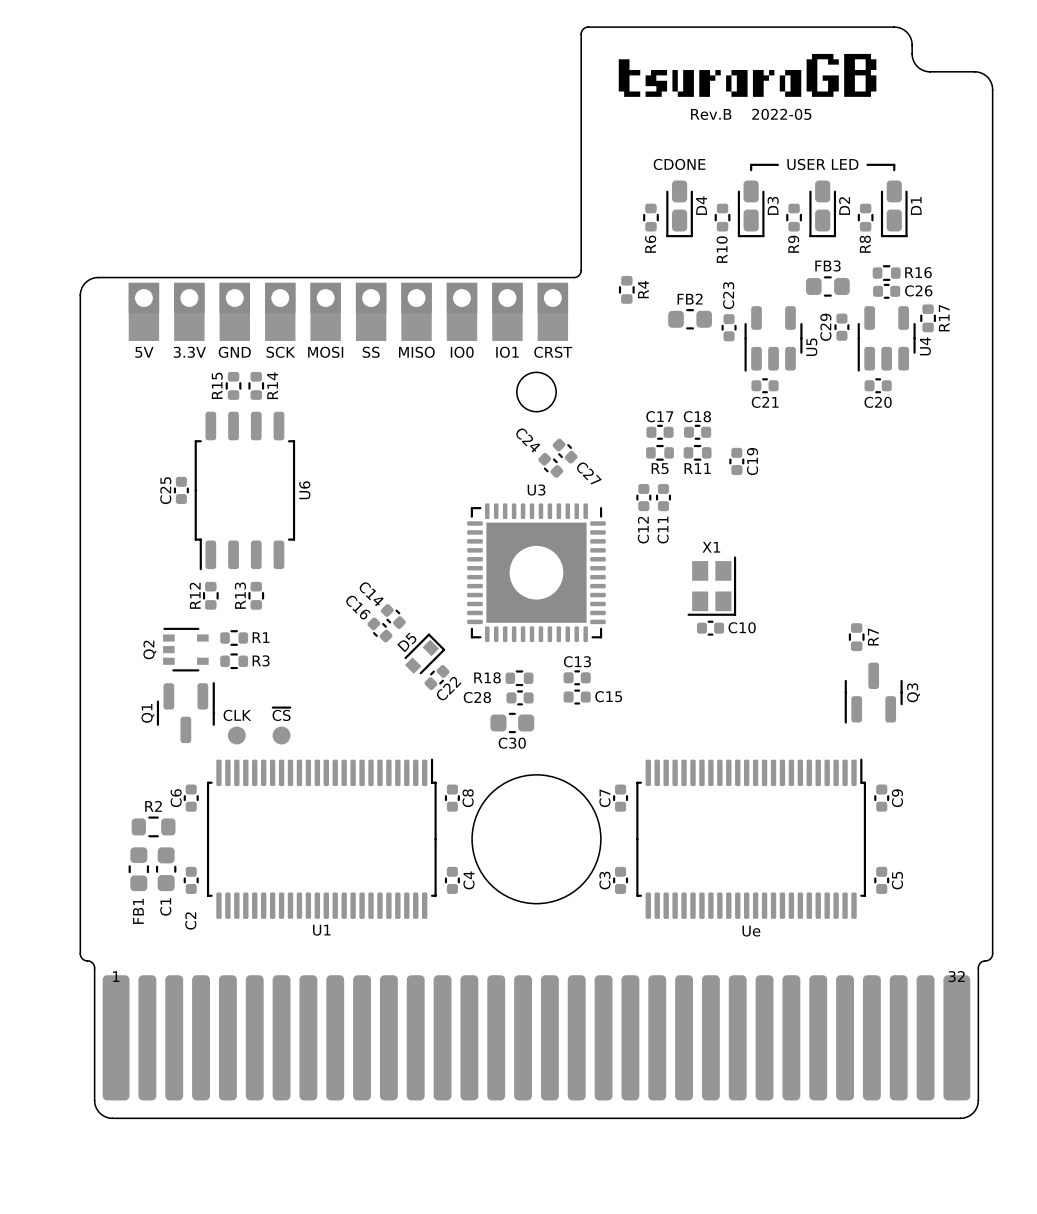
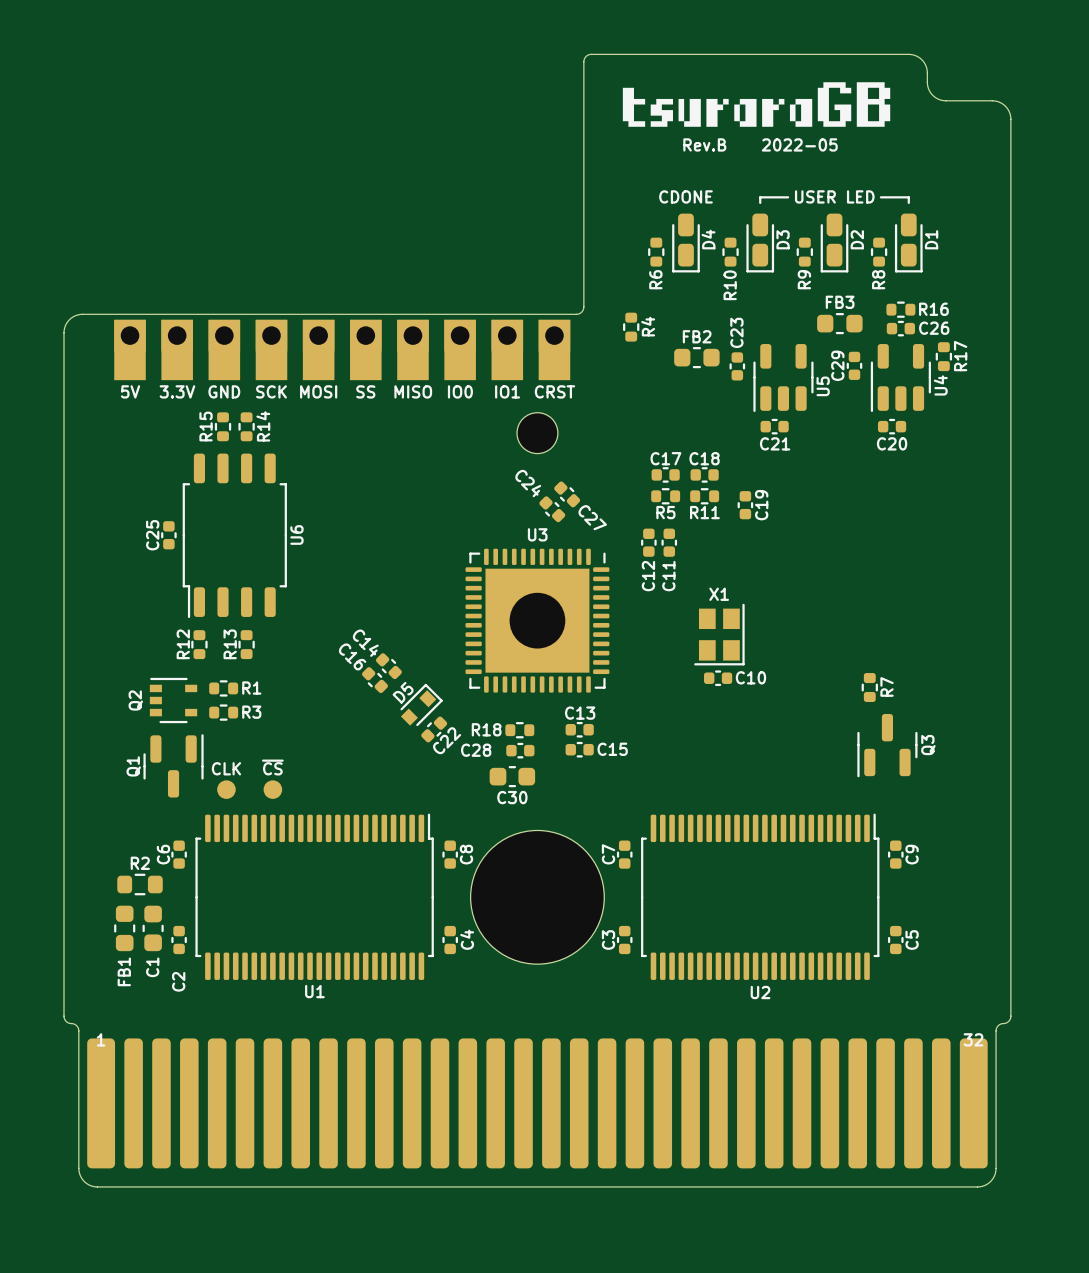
Ue name: Ue (751, 931) -> U2 (760, 992)

